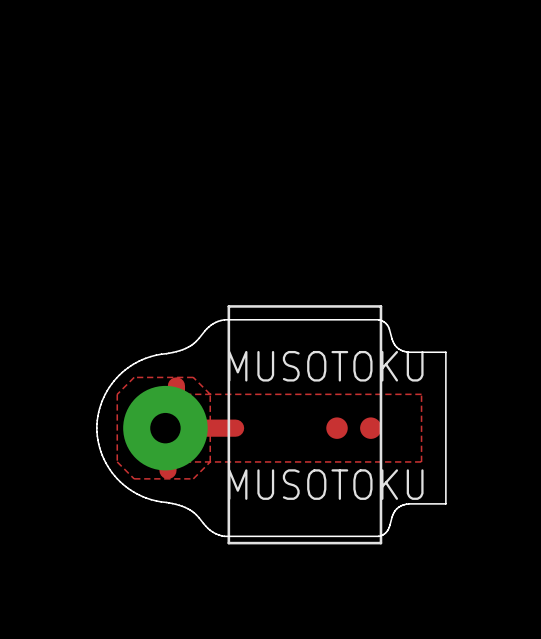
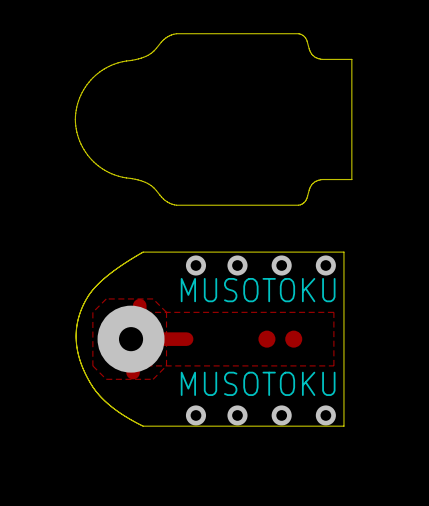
line: (228, 306) (228, 543) (380, 543) (380, 306) (228, 306) -> none
board edge: none -> (143, 252) (343, 252) (343, 426) (143, 426) (108, 403) (92, 386) (81, 364) (76, 341) (77, 320) (85, 300) (96, 285) (115, 269) (143, 252)
board edge: (224, 319) (378, 319) (387, 325) (393, 343) (400, 350) (408, 352) (445, 352) (445, 503) (408, 503) (400, 506) (393, 512) (387, 531) (378, 536) (224, 536) (210, 530) (187, 508) (145, 497) (123, 484) (107, 466) (97, 440) (97, 416) (107, 390) (119, 375) (133, 364) (150, 356) (185, 348) (196, 341) (211, 325) (224, 319) -> (176, 33) (298, 33) (305, 38) (310, 52) (316, 57) (351, 59) (351, 179) (316, 181) (310, 186) (305, 201) (298, 205) (176, 205) (165, 200) (147, 183) (114, 174) (96, 164) (83, 149) (76, 128) (76, 110) (83, 89) (93, 77) (104, 69) (118, 62) (145, 56) (154, 50) (165, 37) (176, 33)
via: none -> (195, 265)
via: none -> (237, 265)
via: none -> (281, 265)
via: none -> (325, 265)
via: none -> (195, 415)
via: none -> (237, 415)
via: none -> (281, 415)
via: none -> (325, 415)

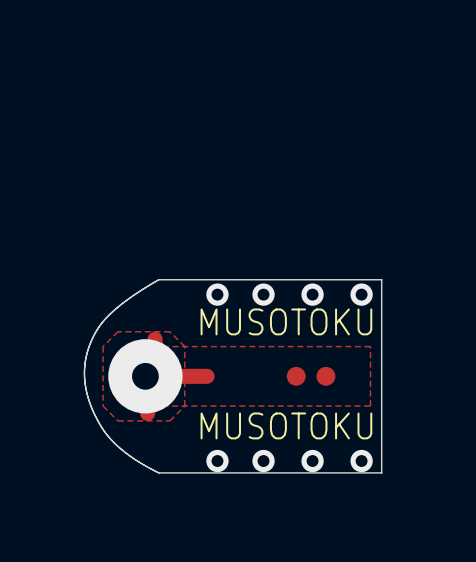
board edge: (176, 33) (298, 33) (305, 38) (310, 52) (316, 57) (351, 59) (351, 179) (316, 181) (310, 186) (305, 201) (298, 205) (176, 205) (165, 200) (147, 183) (114, 174) (96, 164) (83, 149) (76, 128) (76, 110) (83, 89) (93, 77) (104, 69) (118, 62) (145, 56) (154, 50) (165, 37) (176, 33) -> none

